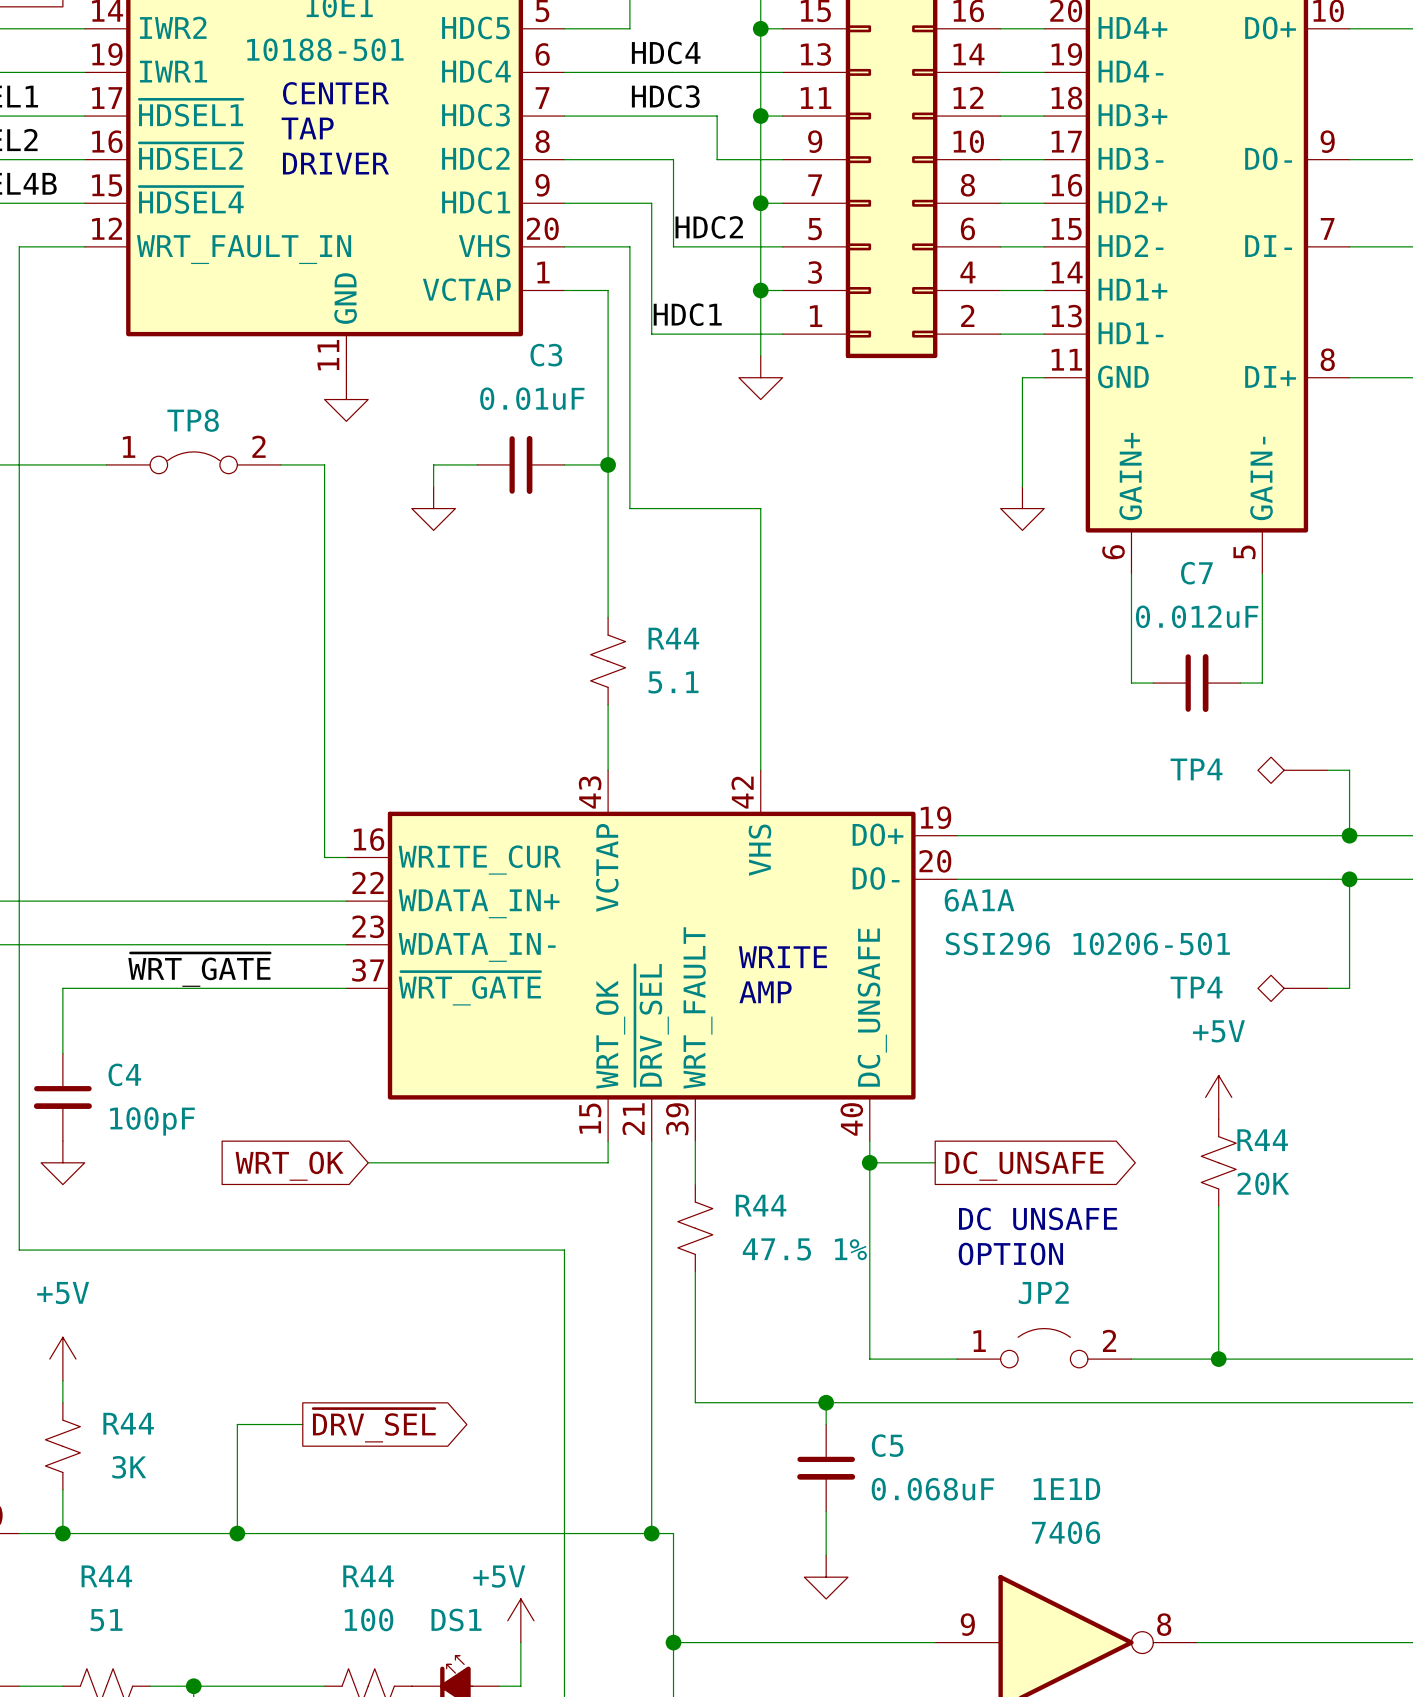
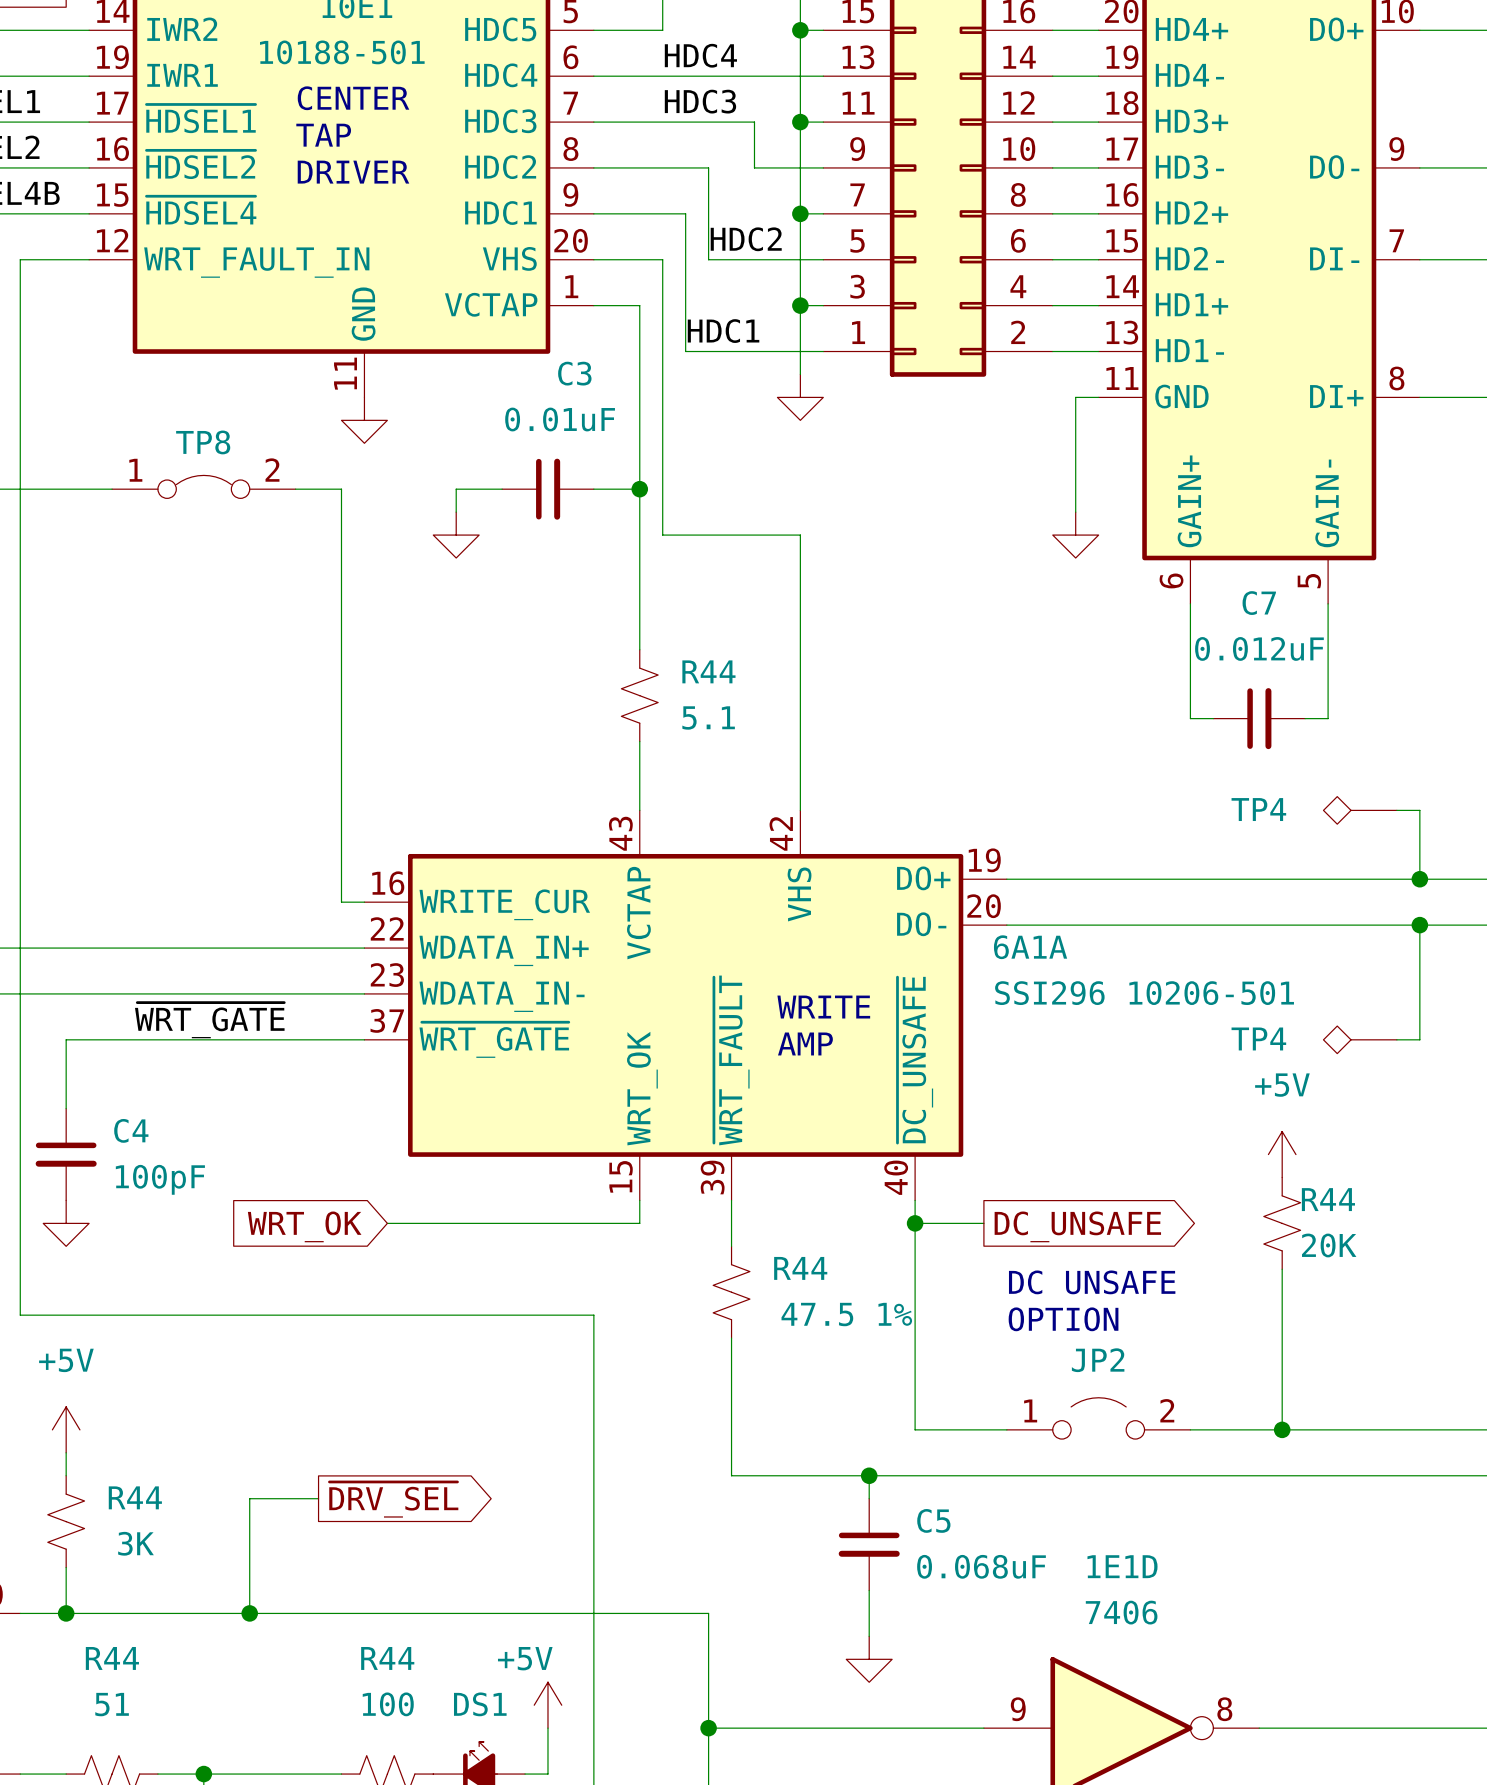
6A1A symbol: [346, 770, 958, 1142] -> [364, 810, 1007, 1201]
wire: (651, 1141) (651, 1533) -> none
junction: (651, 1533) -> none

